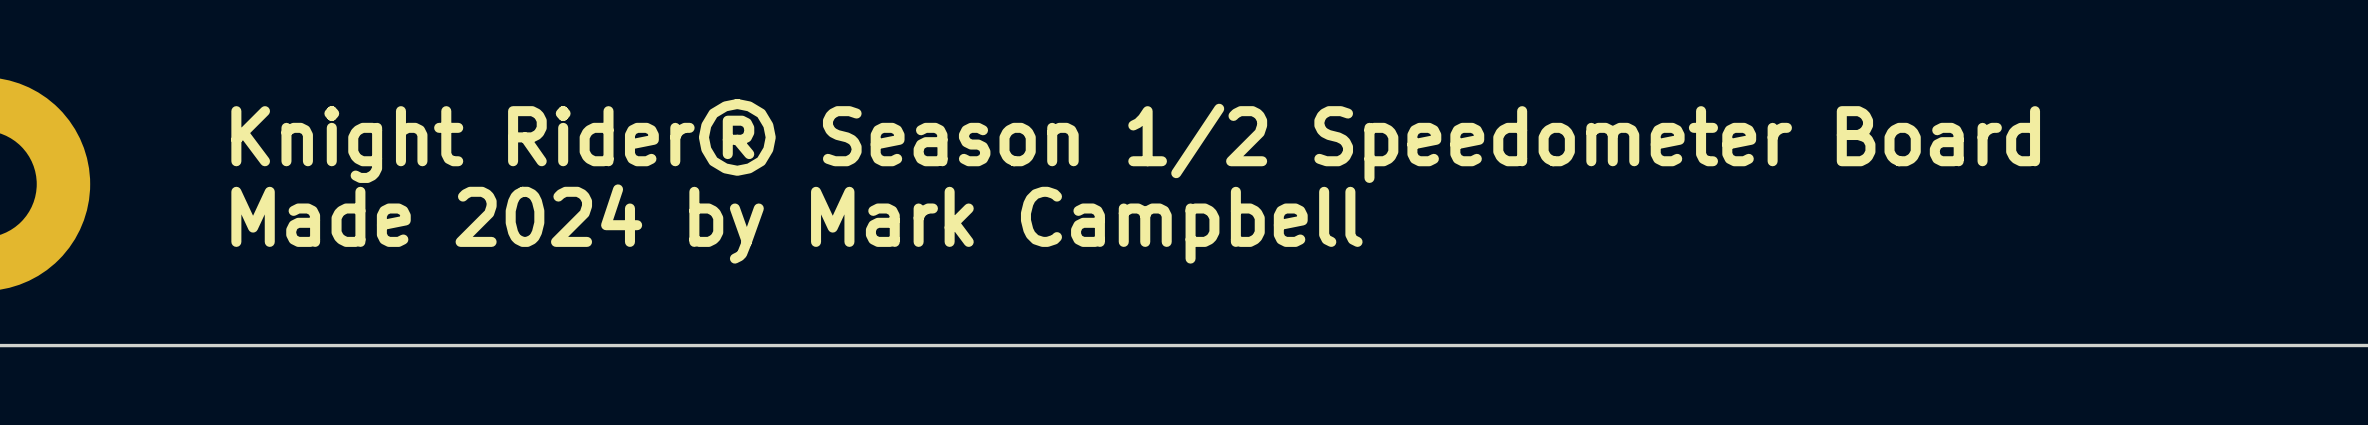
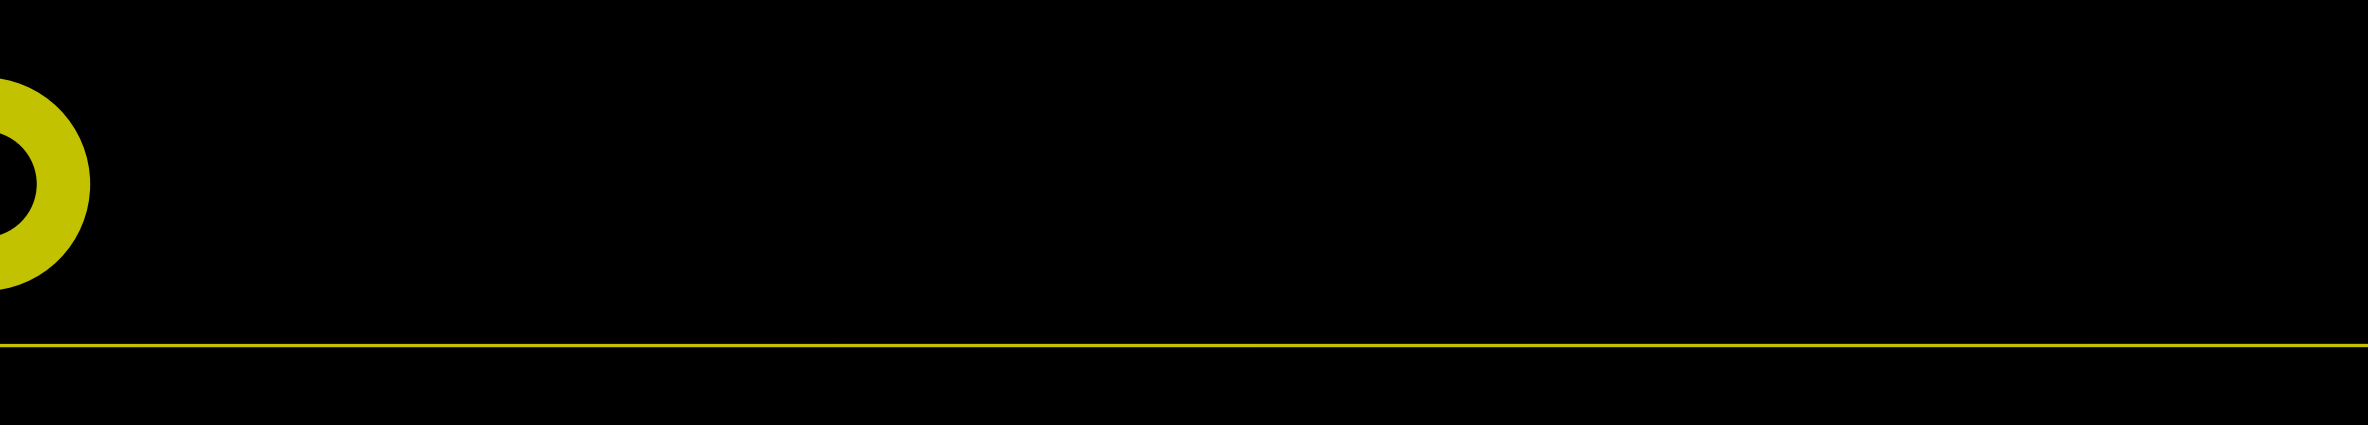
text: Knight Rider® Season 1/2 Speedometer Board (1135, 140) -> none
text: Made 2024 by Mark Campbell (796, 224) -> none

